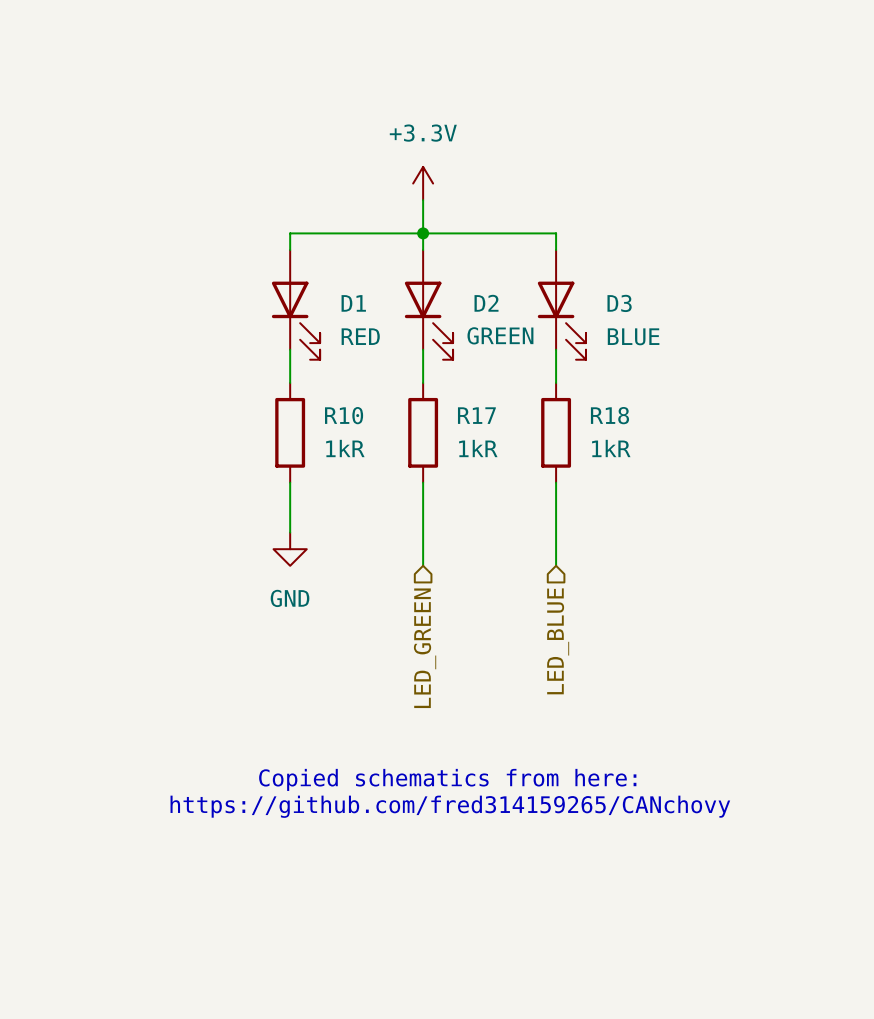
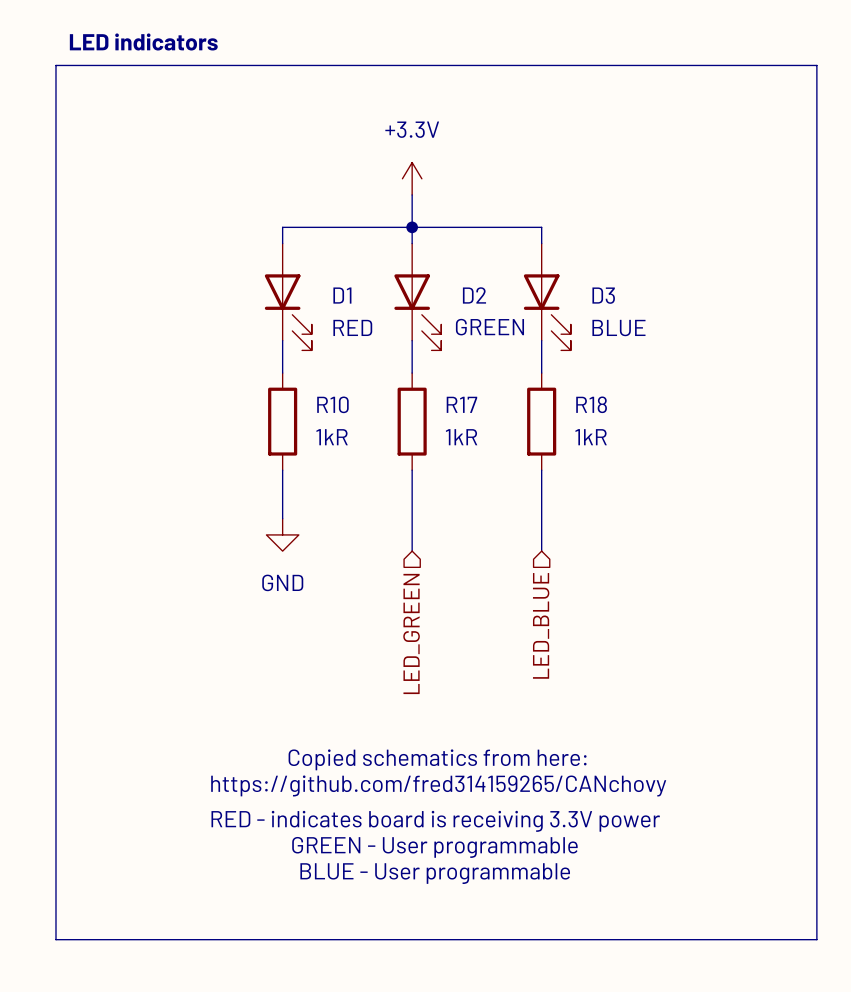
text: none -> LED indicators (143, 41)
line: none -> (55, 65) (816, 65) (816, 939) (55, 939) (55, 65)
text: none -> RED - indicates board is receiving 3.3V power (435, 821)
text: none -> GREEN - User programmable (434, 847)
text: none -> BLUE - User programmable (435, 873)

